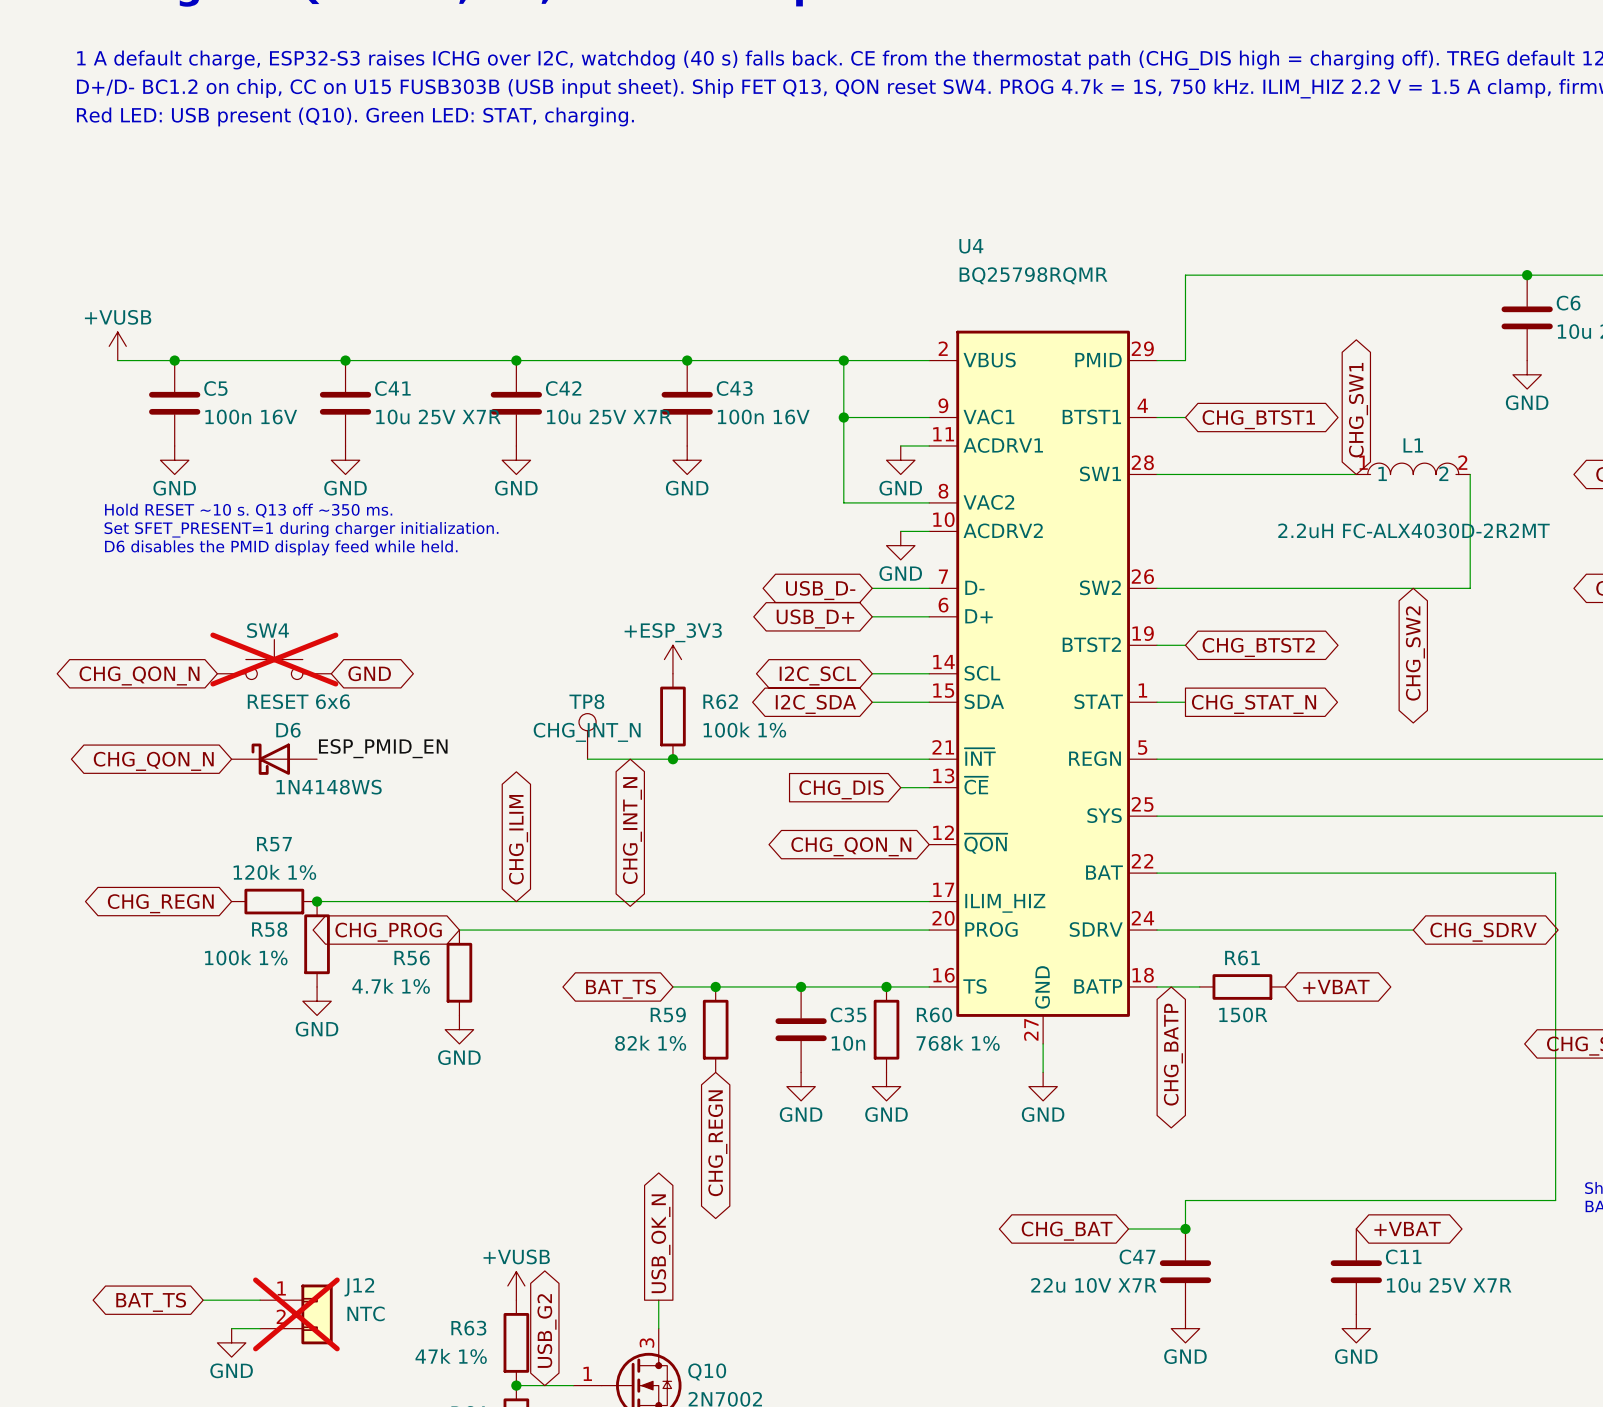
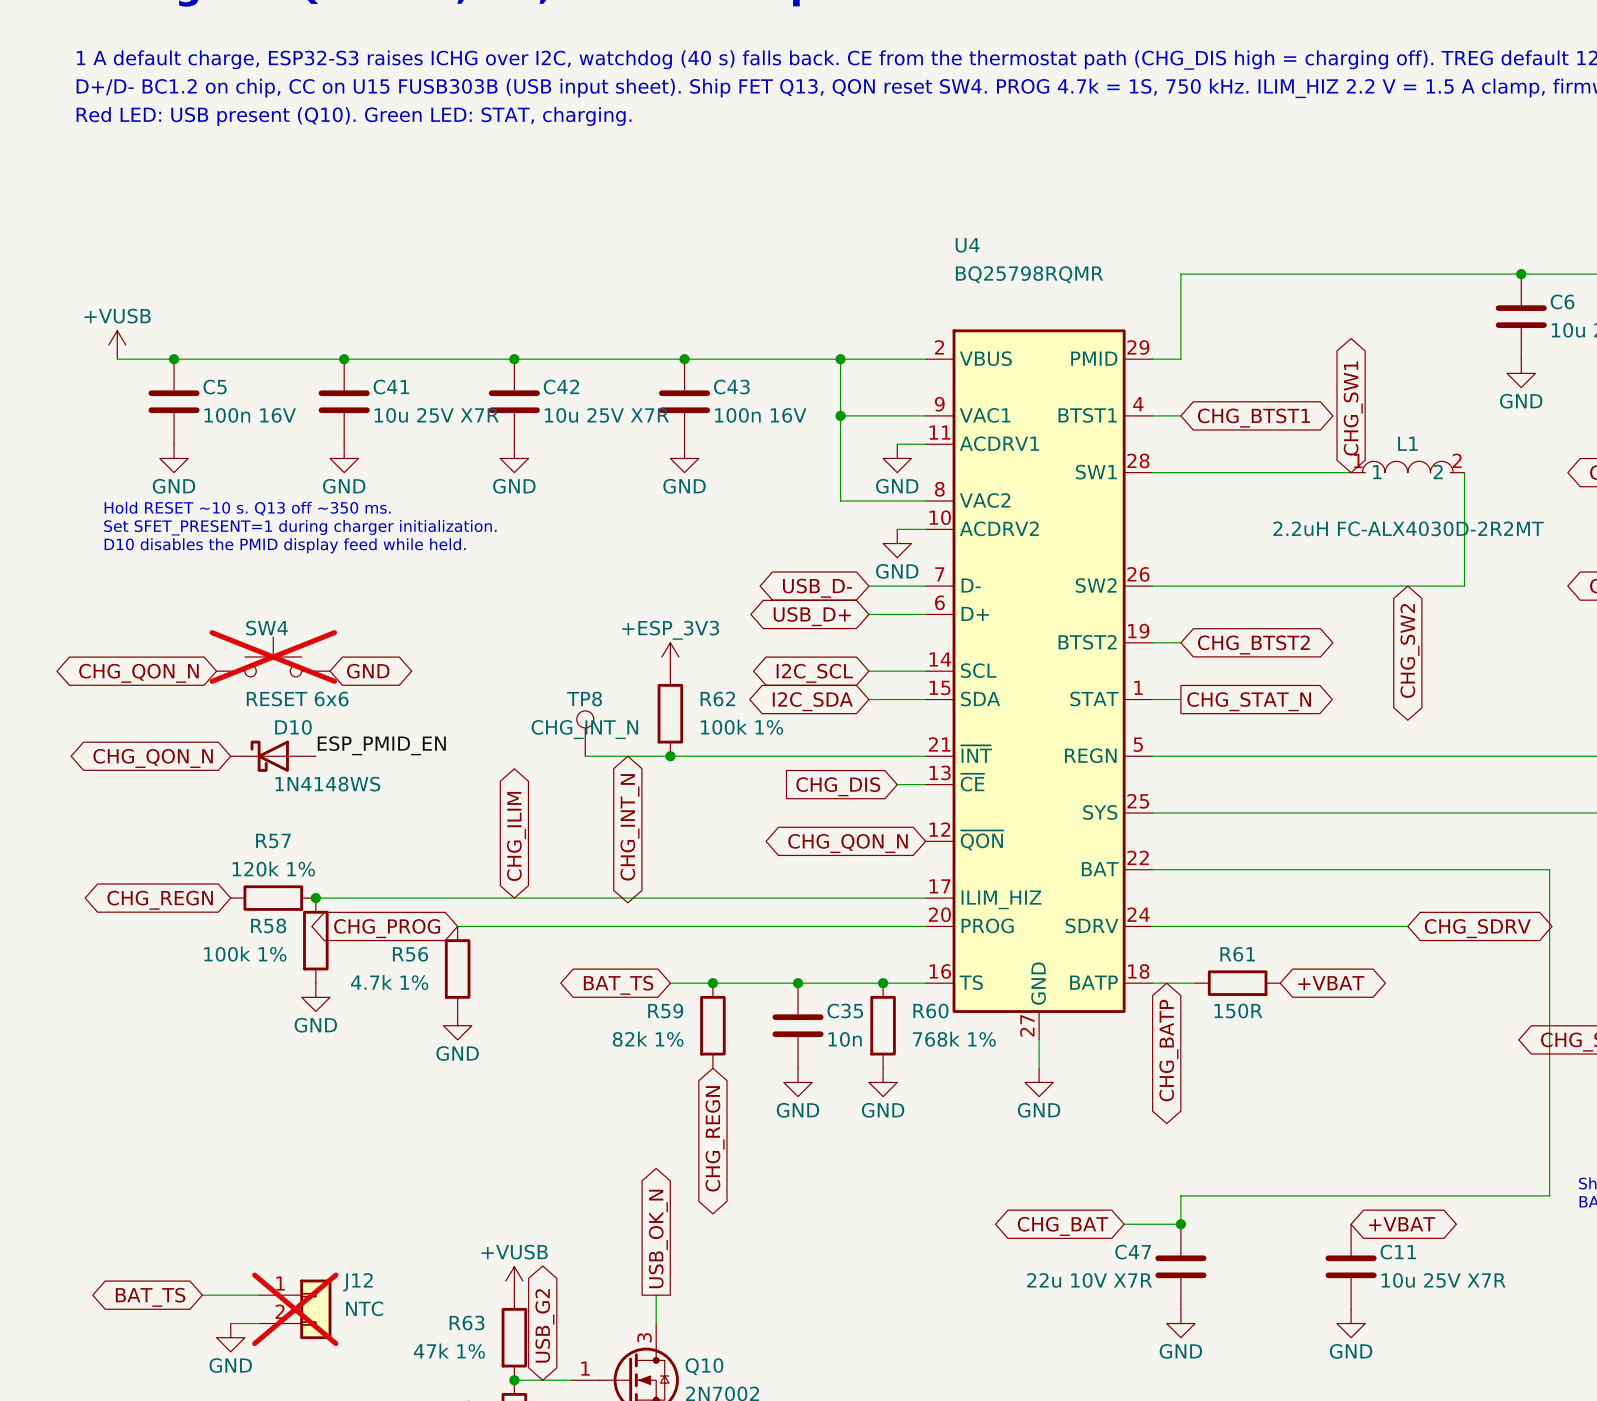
text: D6 disables the PMID display feed while held. (281, 547) -> D10 disables the PMID display feed while held. (285, 545)
D6 name: D6 (288, 730) -> D10 (293, 727)

